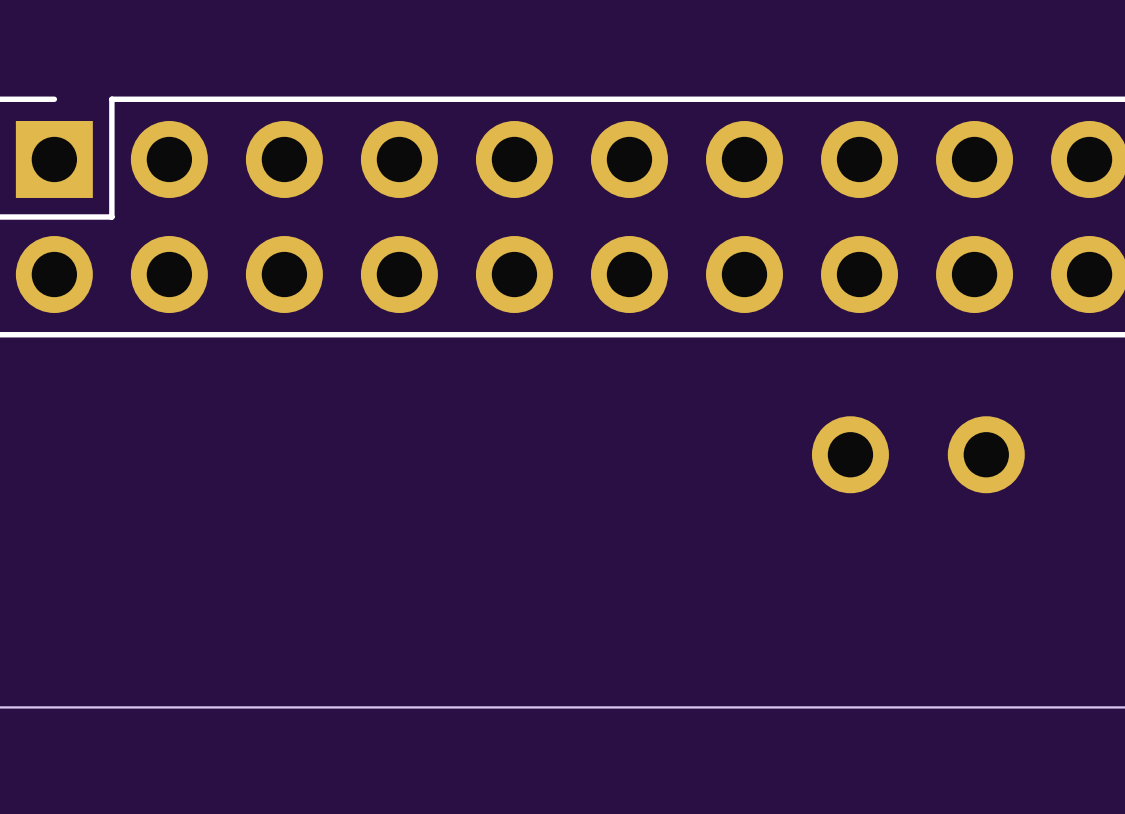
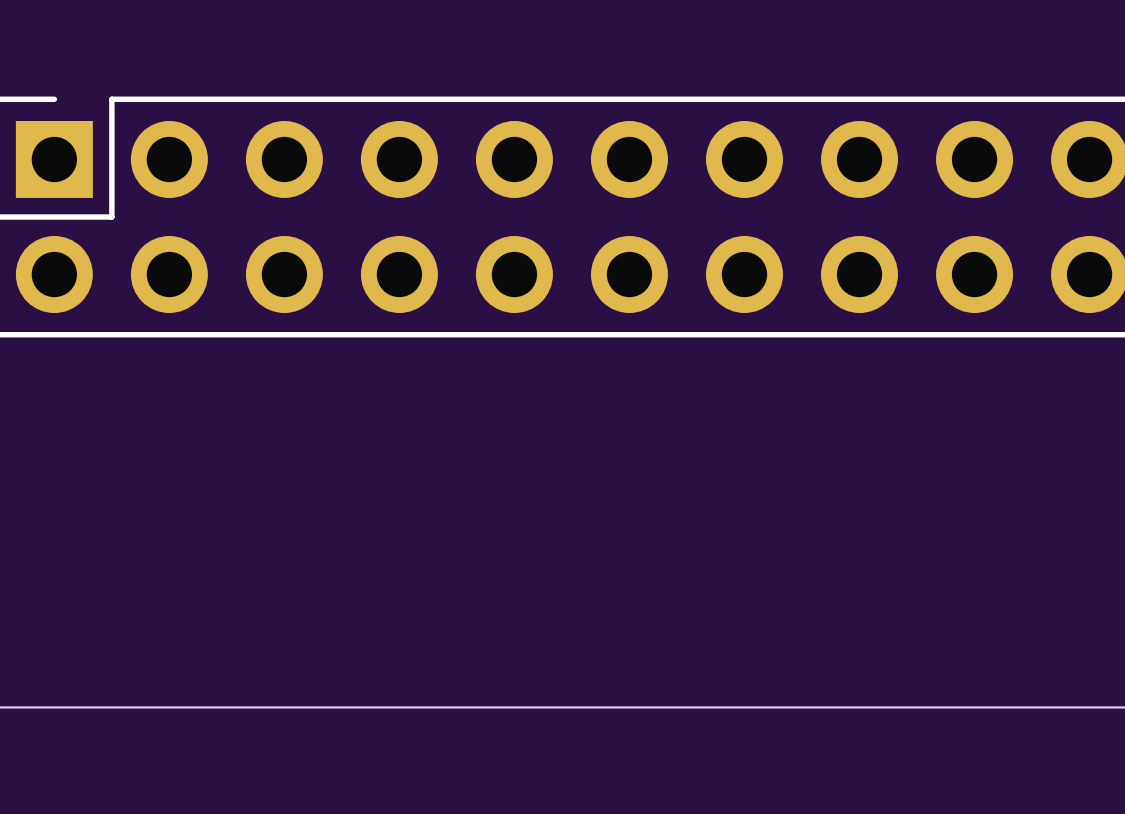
part: (850, 454) -> none
part: (986, 454) -> none

